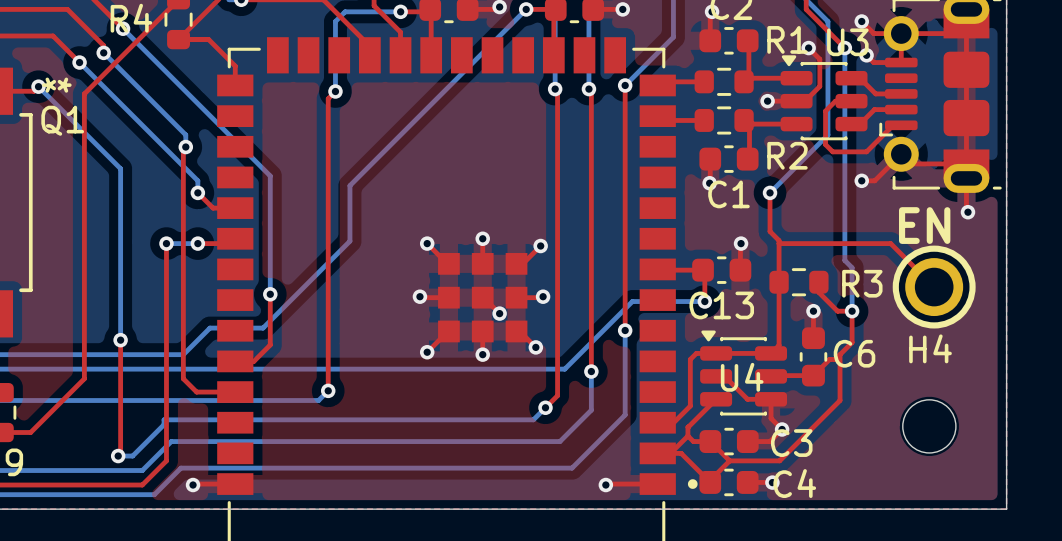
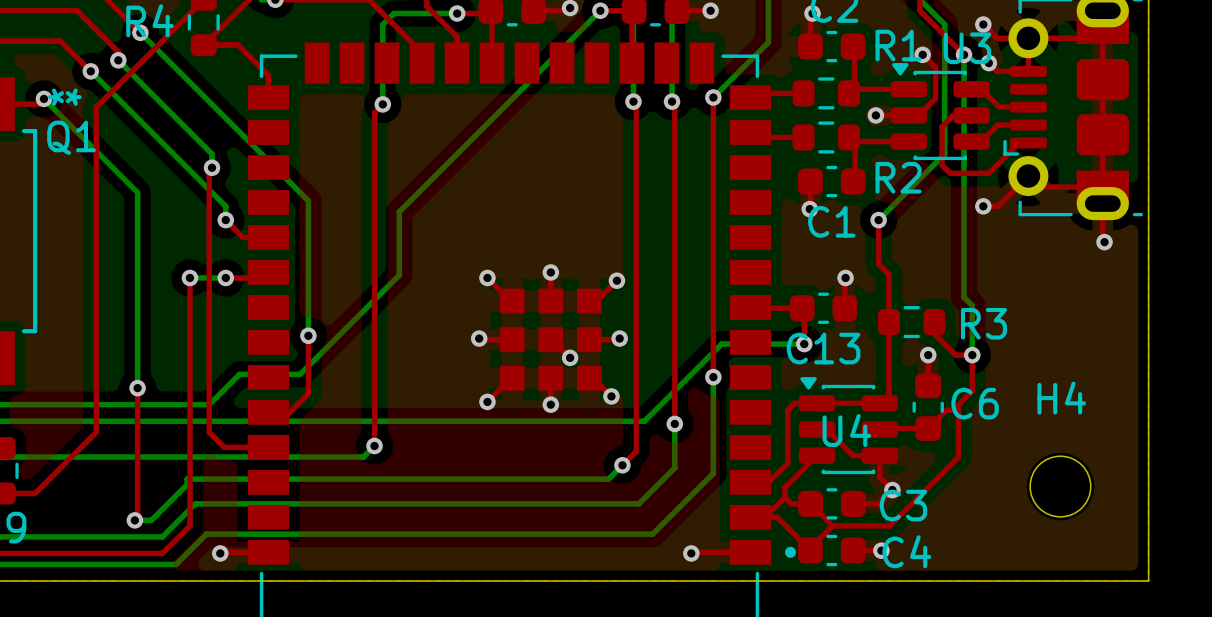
top track: (779, 243) (890, 243) (934, 287) -> none
part: (934, 287) -> none

